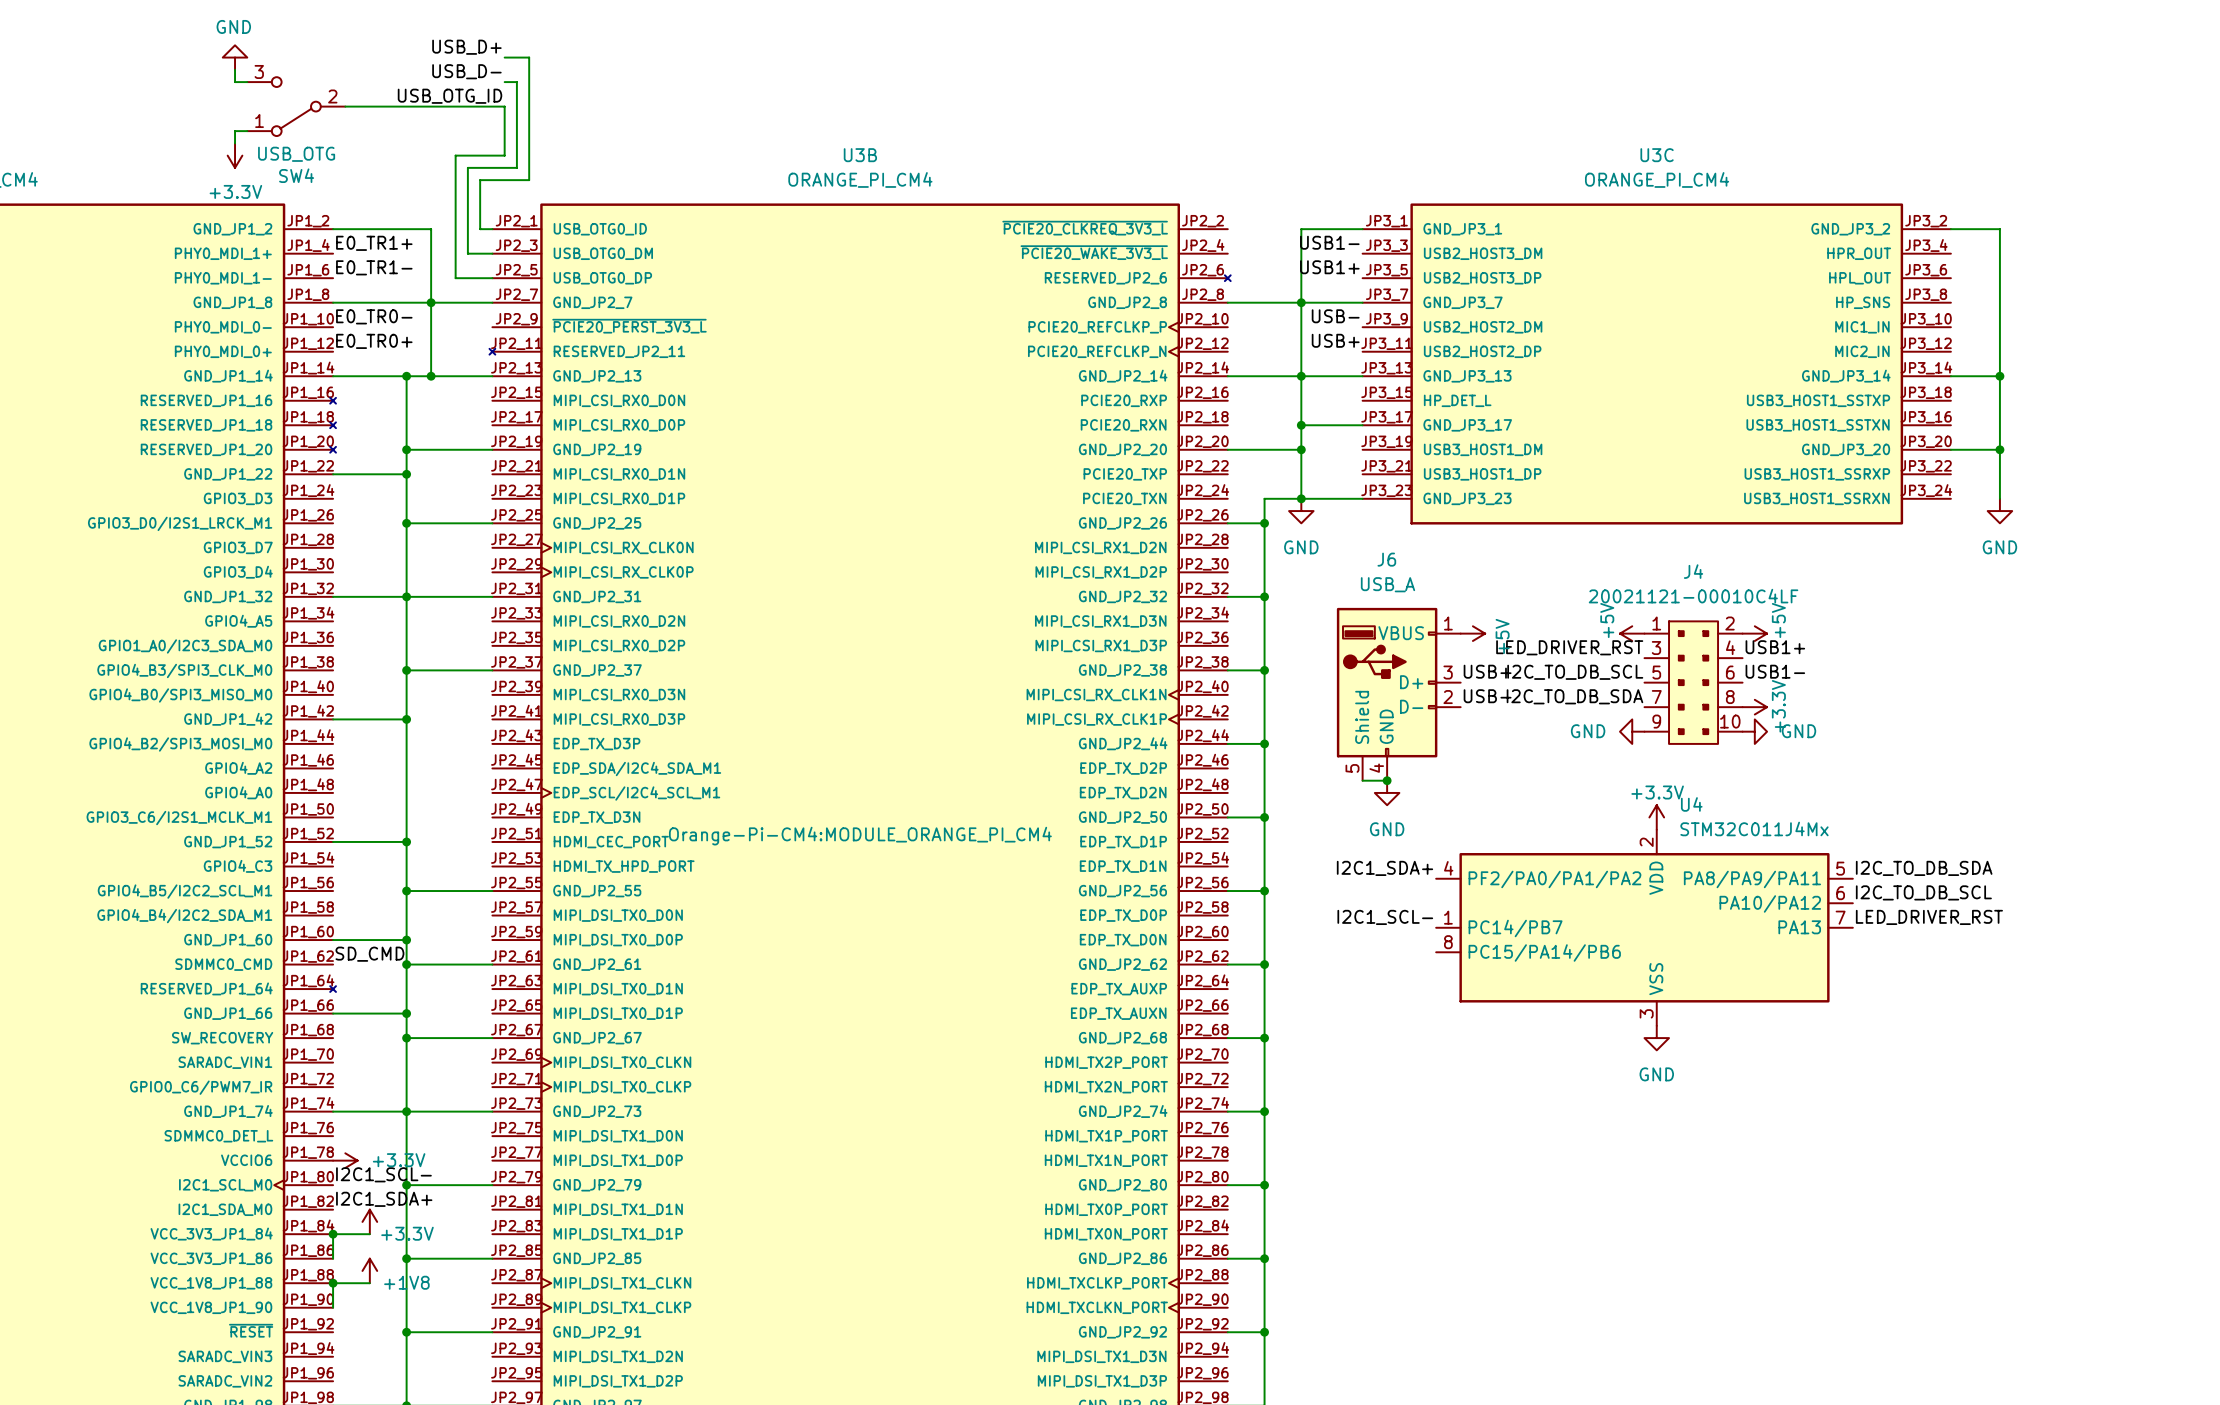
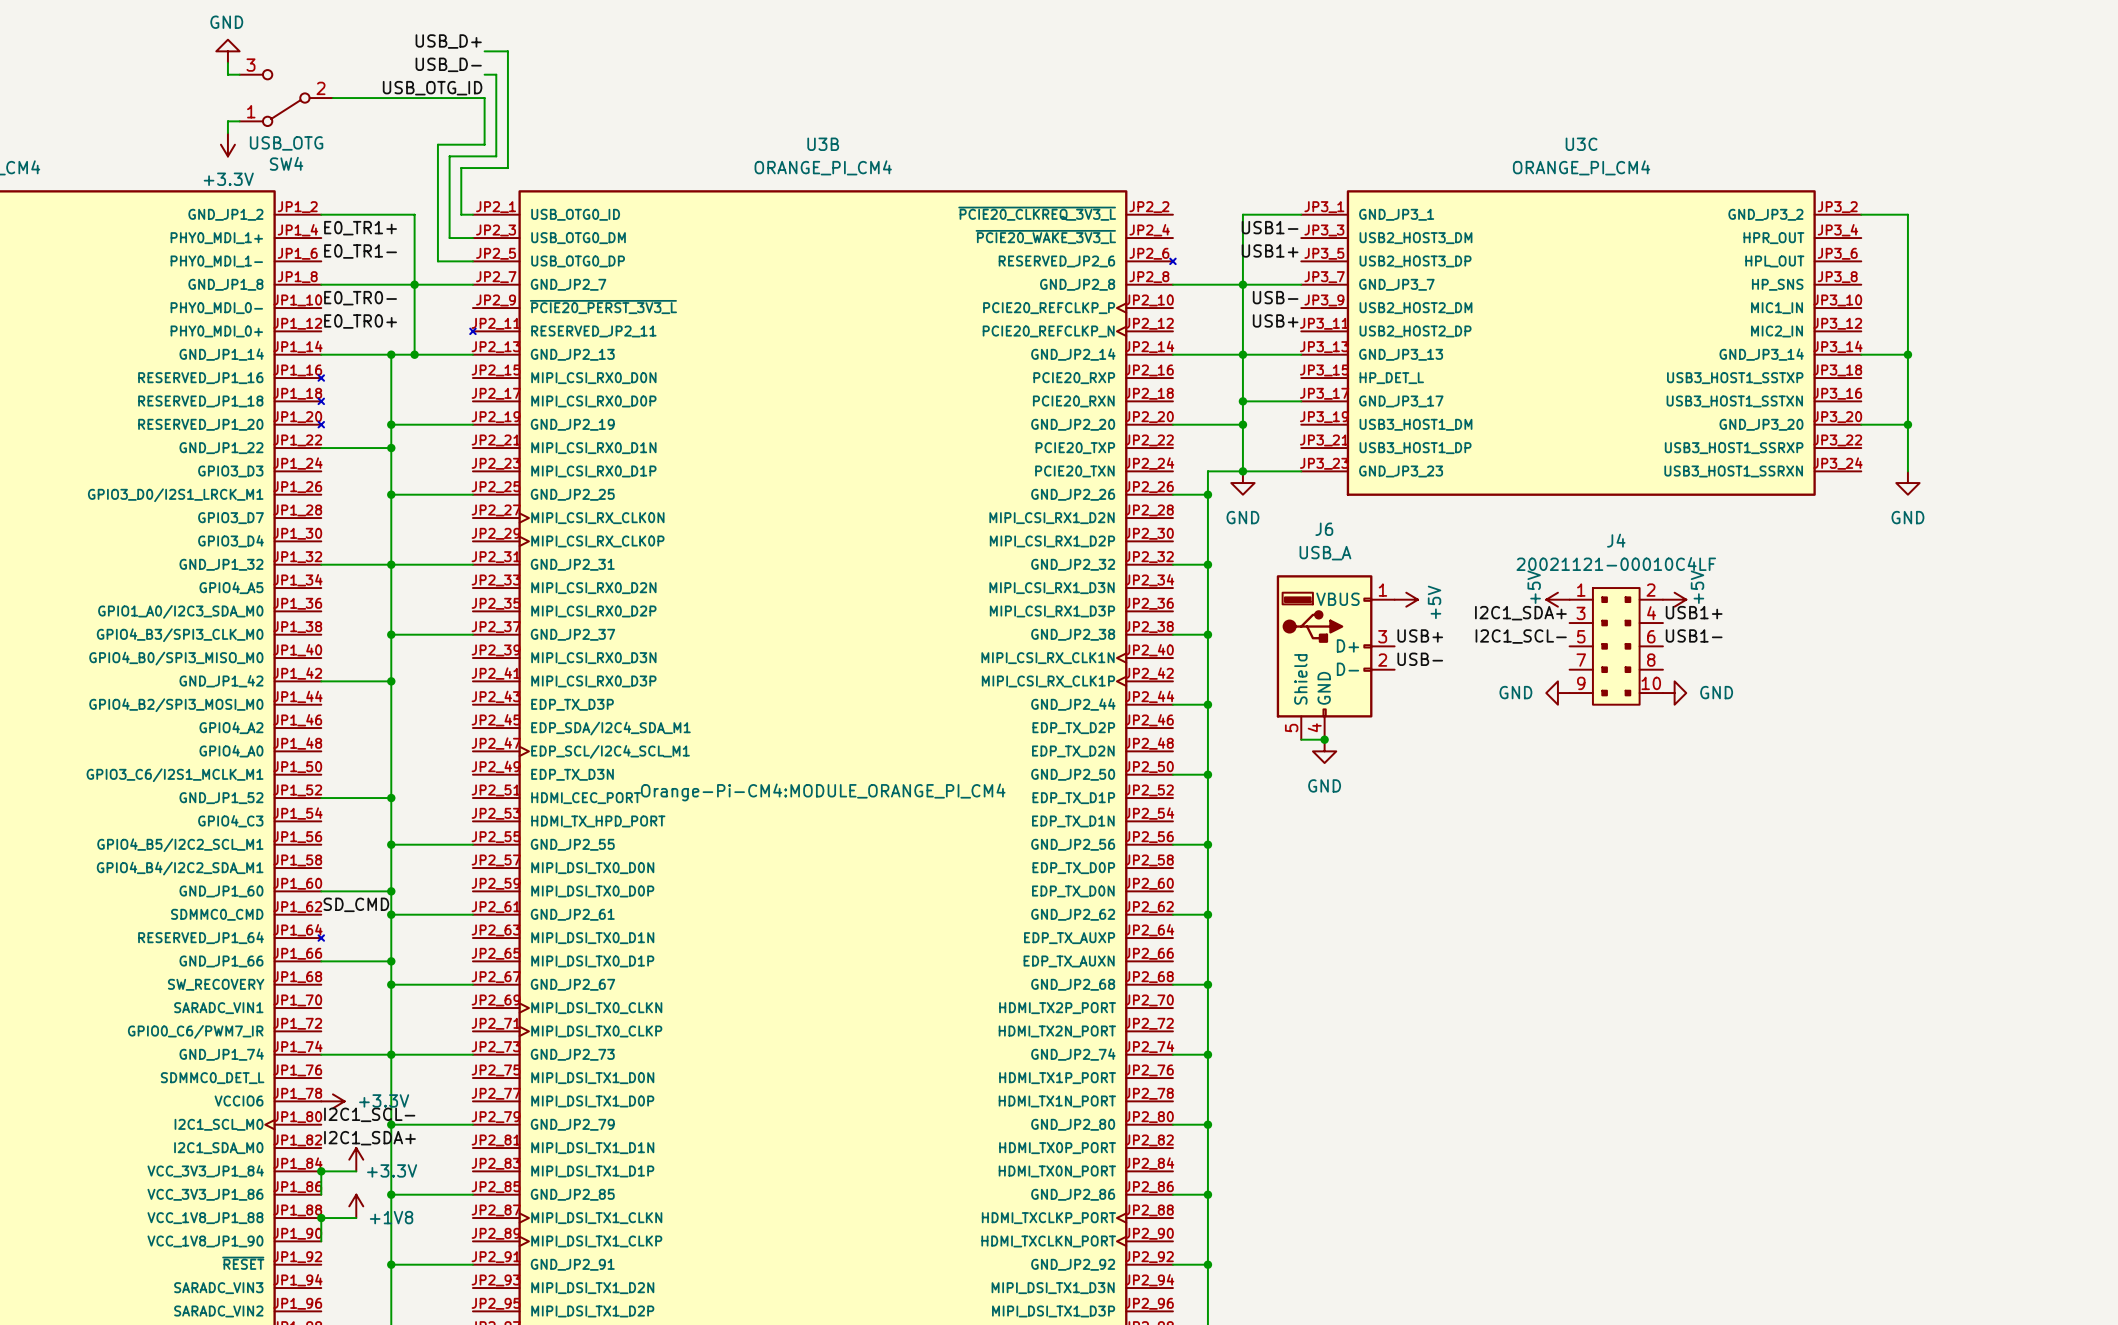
label: LED_DRIVER_RST (1569, 647) -> I2C1_SDA+ (1520, 613)
label: I2C_TO_DB_SCL (1575, 672) -> I2C1_SCL- (1521, 636)
label: I2C_TO_DB_SDA (1574, 696) -> none
power symbol: +3.3V (1754, 707) -> none
power symbol: +3.3V (1656, 817) -> none
label: I2C1_SDA+ (1384, 868) -> none
label: I2C_TO_DB_SDA (1924, 868) -> none
label: I2C_TO_DB_SCL (1923, 892) -> none
label: I2C1_SCL- (1385, 917) -> none
label: LED_DRIVER_RST (1929, 917) -> none
U4: STM32C011J4Mx (1644, 927) -> none
power symbol: GND (1656, 1038) -> none

